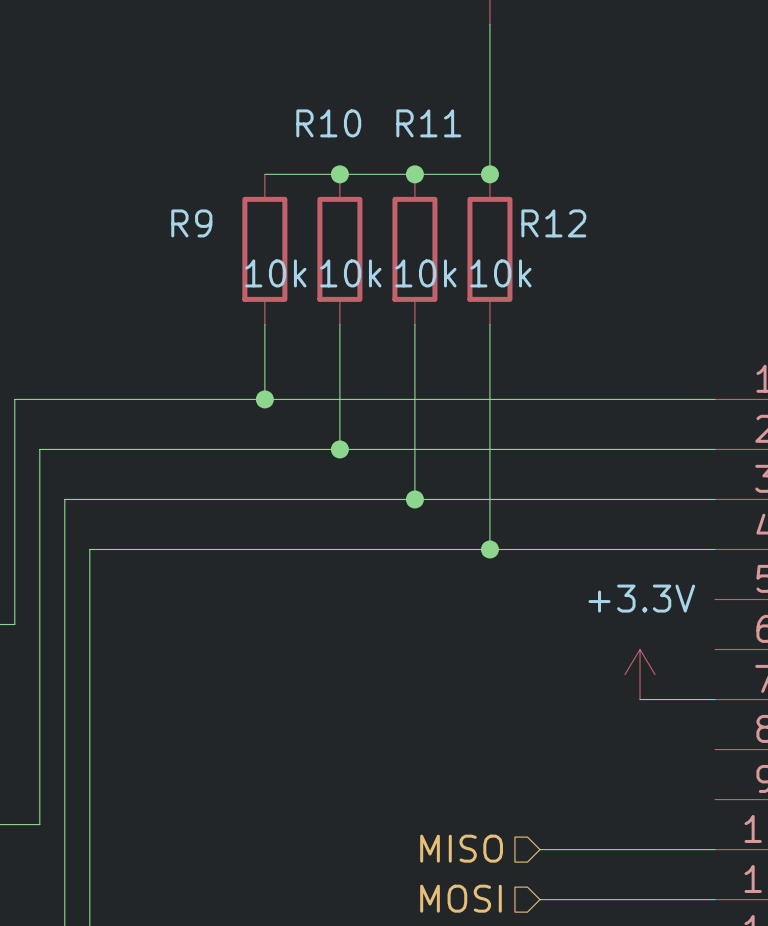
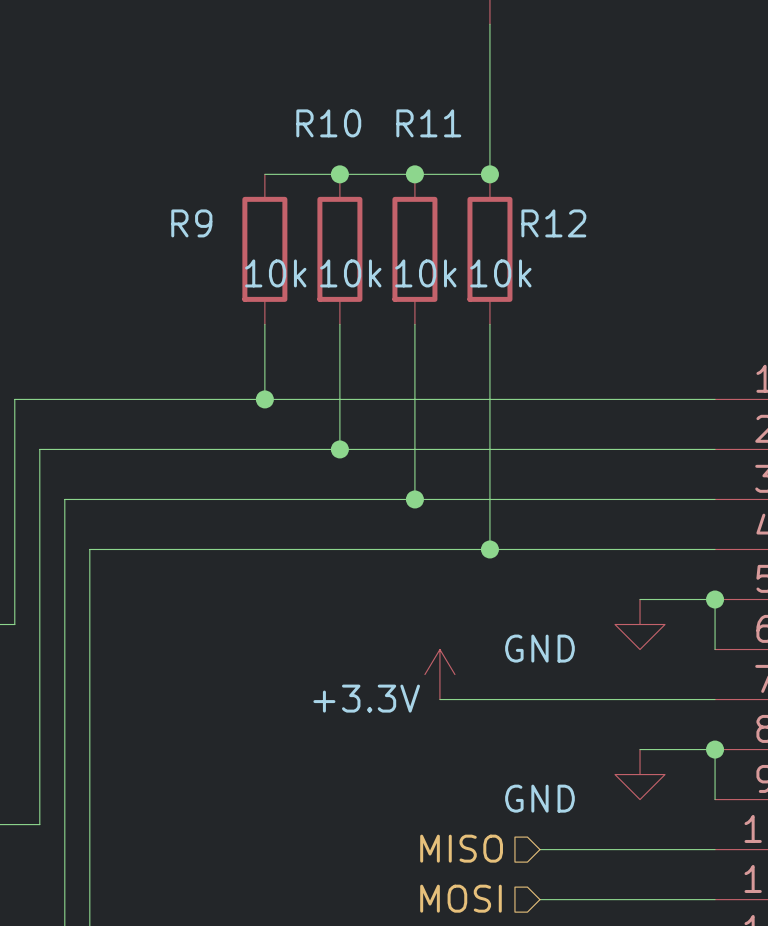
power symbol text position: +3.3V (641, 598) -> +3.3V (366, 698)
wire: none -> (640, 599) (715, 599) (715, 649)
junction: none -> (715, 599)
power symbol: none -> GND (640, 624)
power symbol position: +3.3V (640, 674) -> +3.3V (439, 674)
wire: none -> (439, 699) (640, 699)
wire: none -> (640, 749) (715, 749) (715, 799)
junction: none -> (715, 749)
power symbol: none -> GND (640, 774)

